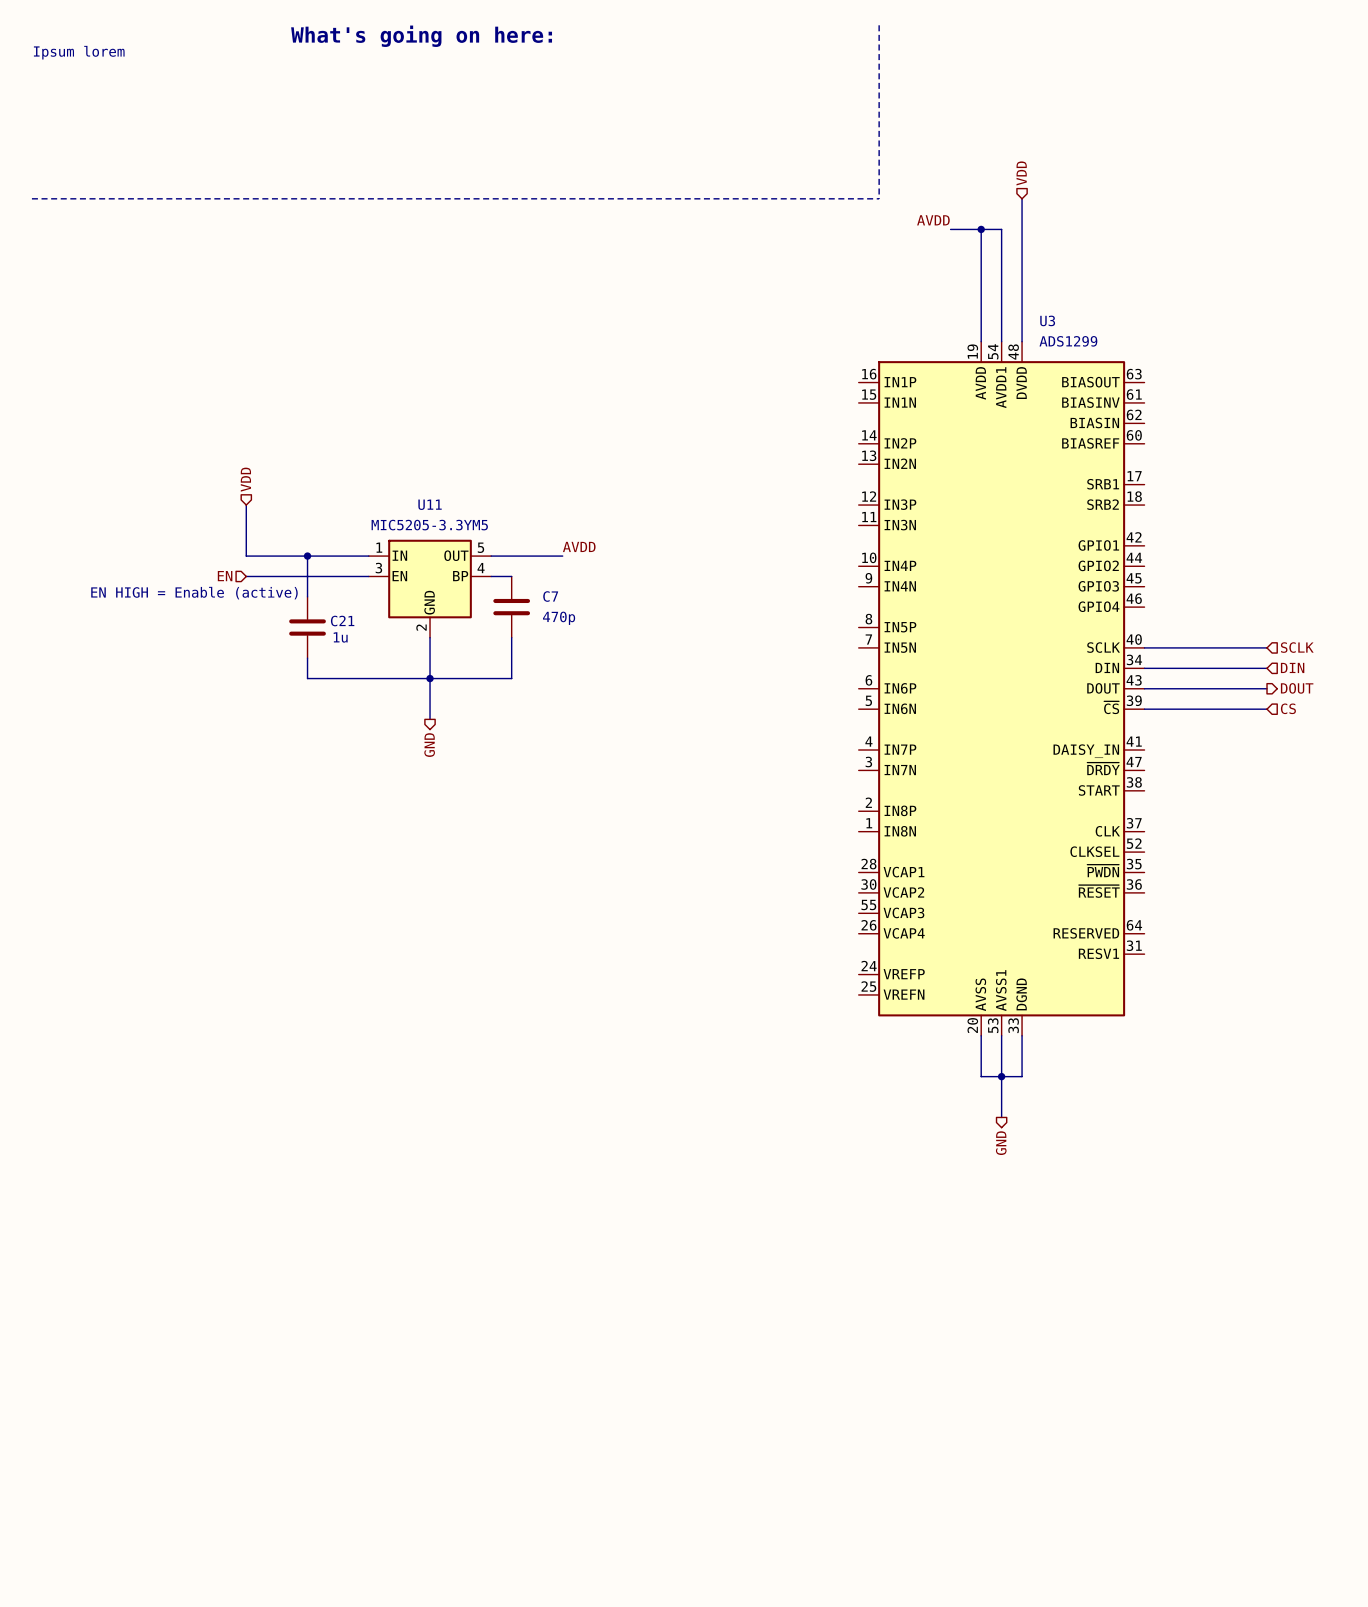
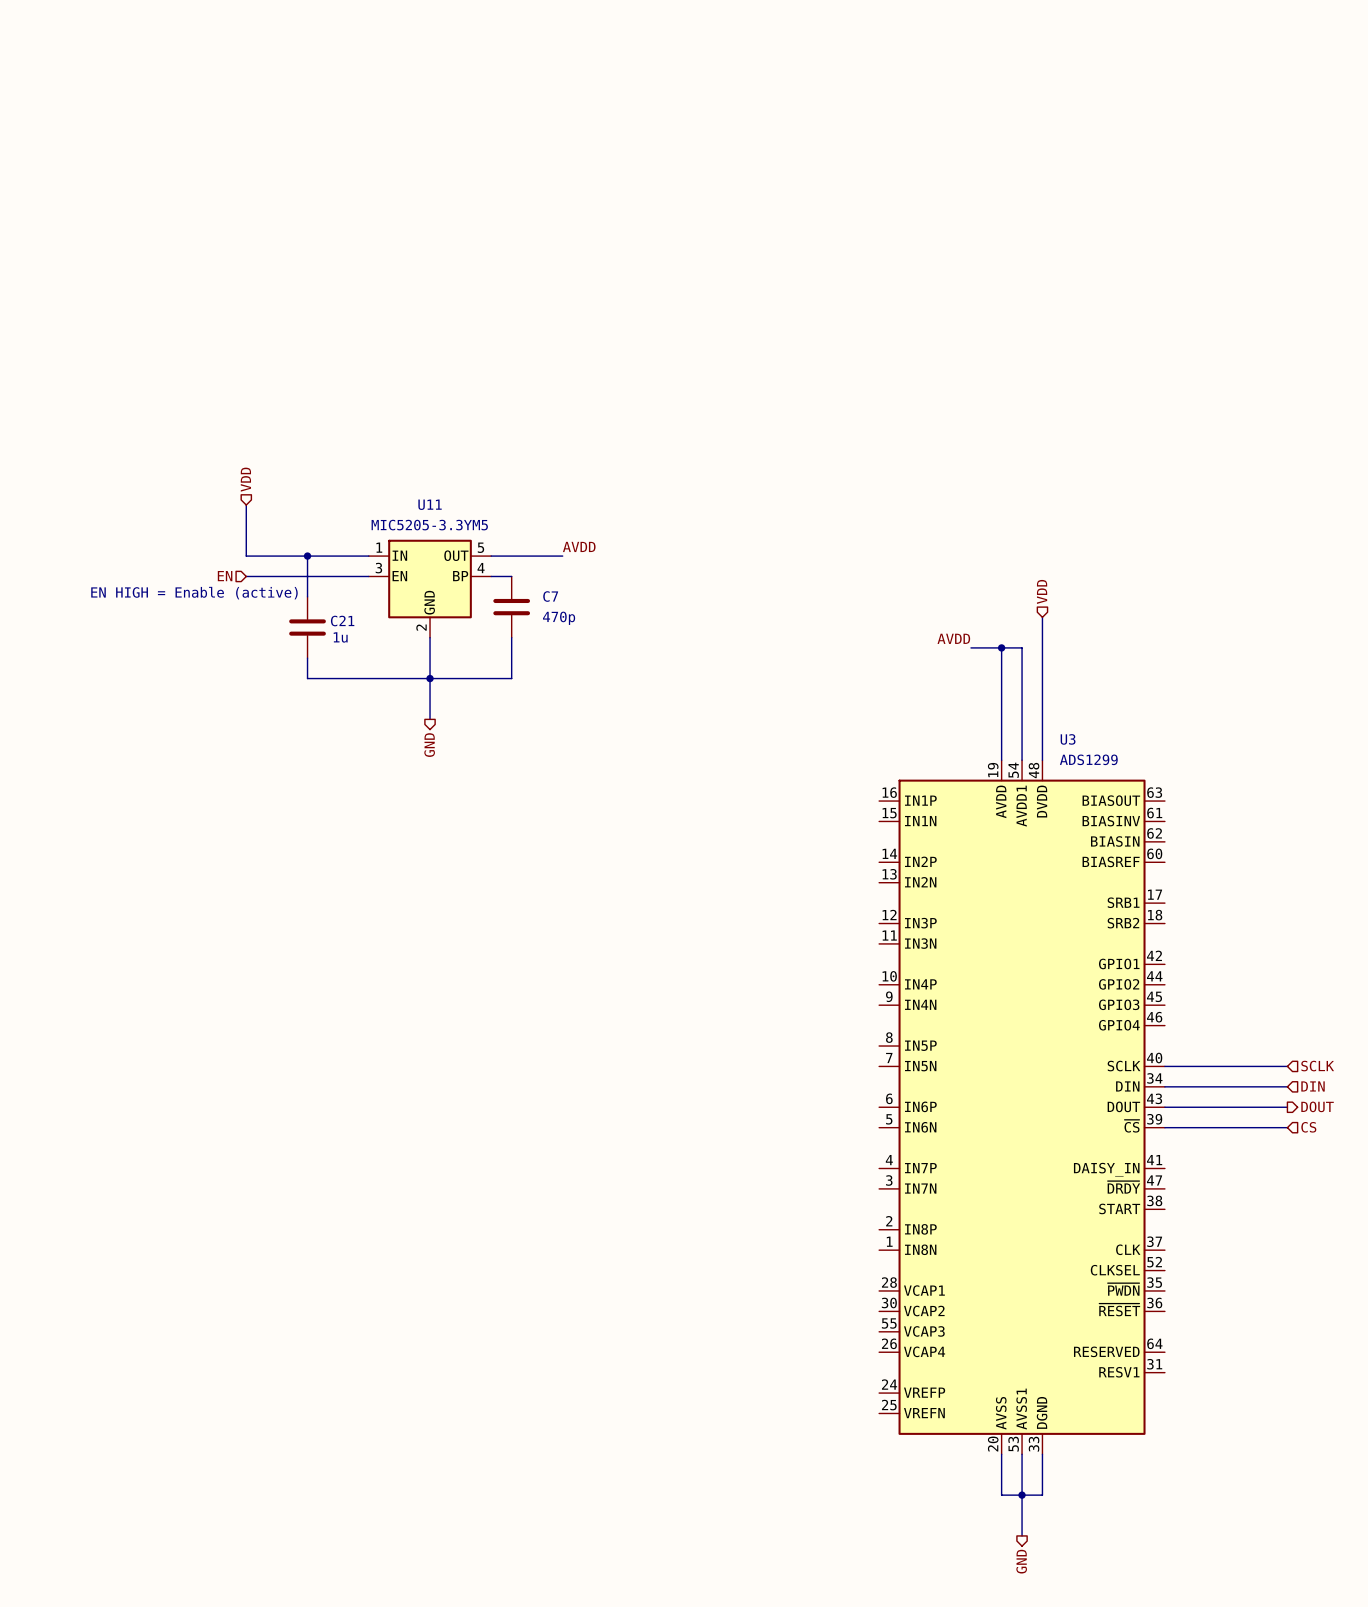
line: (879, 25) (879, 198) (31, 198) -> none
text: What's going on here: (421, 36) -> none
text: Ipsum lorem (79, 52) -> none
hierarchical label: VDD (1021, 173) -> none
wire: (1022, 198) (1022, 341) -> none
label: AVDD (933, 220) -> none
wire: (950, 229) (1001, 229) (1001, 341) -> none
wire: (981, 229) (981, 341) -> none
junction: (981, 229) -> none
hierarchical label: none -> VDD (1042, 591)
label: none -> AVDD (953, 638)
junction: none -> (1001, 647)
wire: (1144, 647) (1267, 647) -> none
hierarchical label: SCLK (1297, 647) -> none
hierarchical label: DIN (1292, 667) -> none
wire: (1144, 668) (1267, 668) -> none
U3 position: (1001, 688) -> (1022, 1107)
wire: (1144, 688) (1267, 688) -> none
hierarchical label: DOUT (1297, 688) -> none
hierarchical label: CS (1288, 708) -> none
wire: (1144, 709) (1267, 709) -> none
wire: none -> (1164, 1066) (1287, 1066)
hierarchical label: none -> SCLK (1317, 1066)
junction: (1001, 1076) -> none
wire: none -> (1164, 1086) (1287, 1086)
hierarchical label: none -> DIN (1313, 1086)
hierarchical label: none -> DOUT (1317, 1106)
wire: none -> (1164, 1107) (1287, 1107)
wire: none -> (1164, 1127) (1287, 1127)
hierarchical label: none -> CS (1308, 1127)
hierarchical label: GND (1001, 1143) -> none
wire: none -> (1001, 1454) (1001, 1495) (1042, 1495) (1042, 1454)
wire: none -> (1022, 1454) (1022, 1535)
junction: none -> (1022, 1495)
hierarchical label: none -> GND (1021, 1561)

